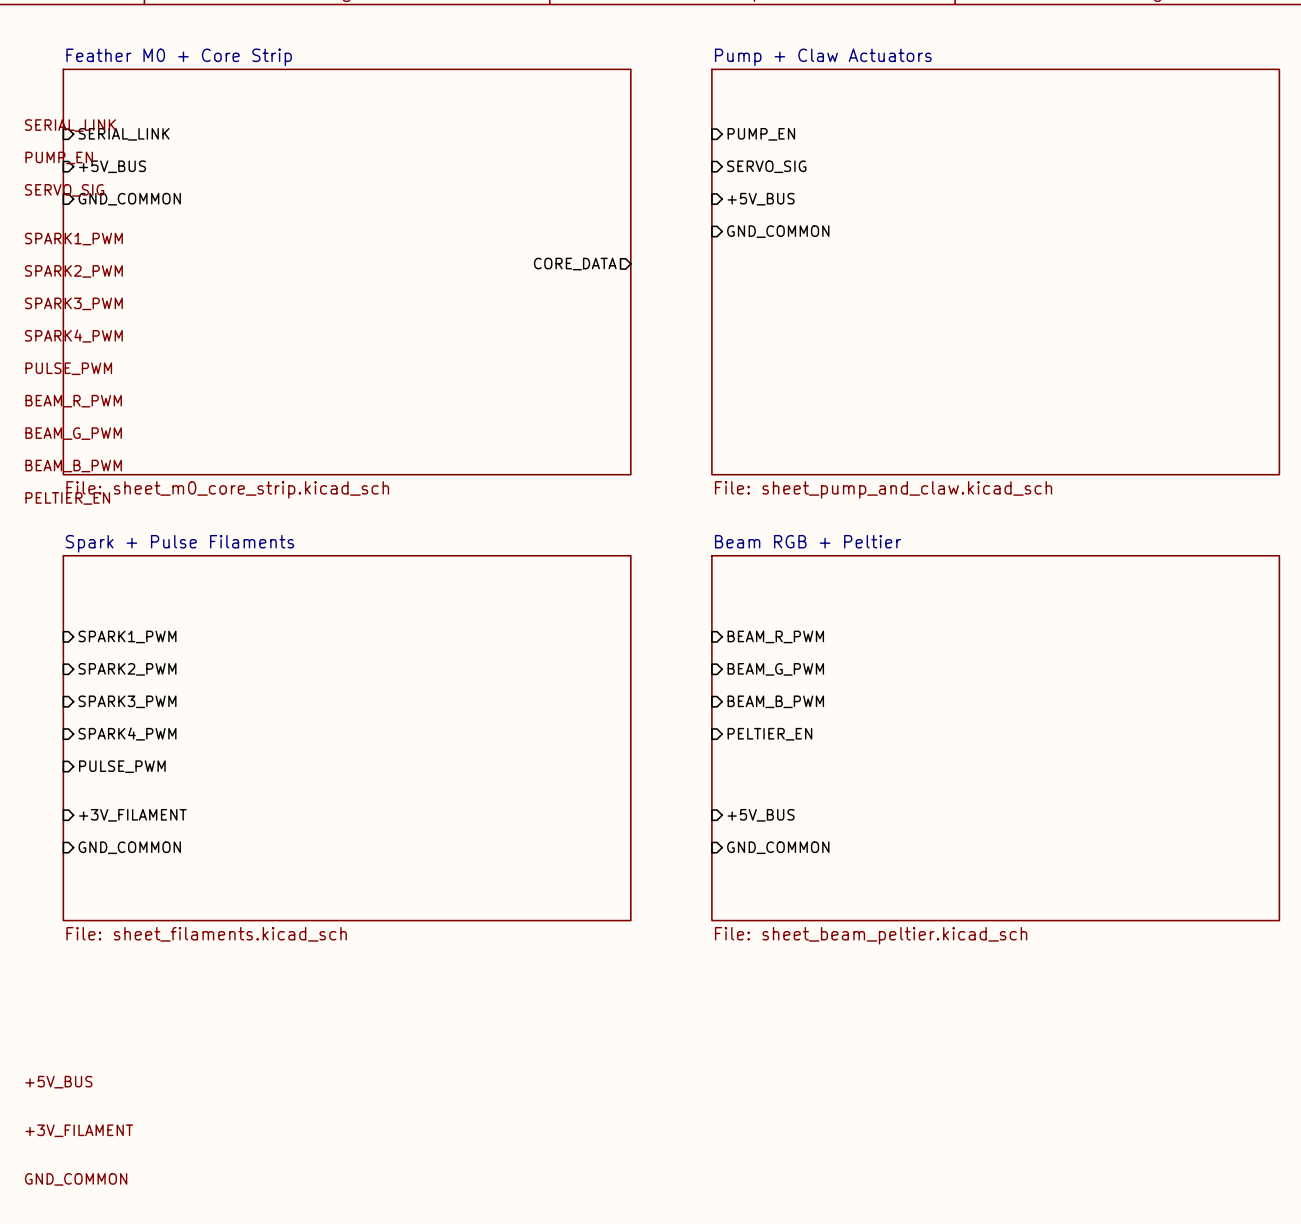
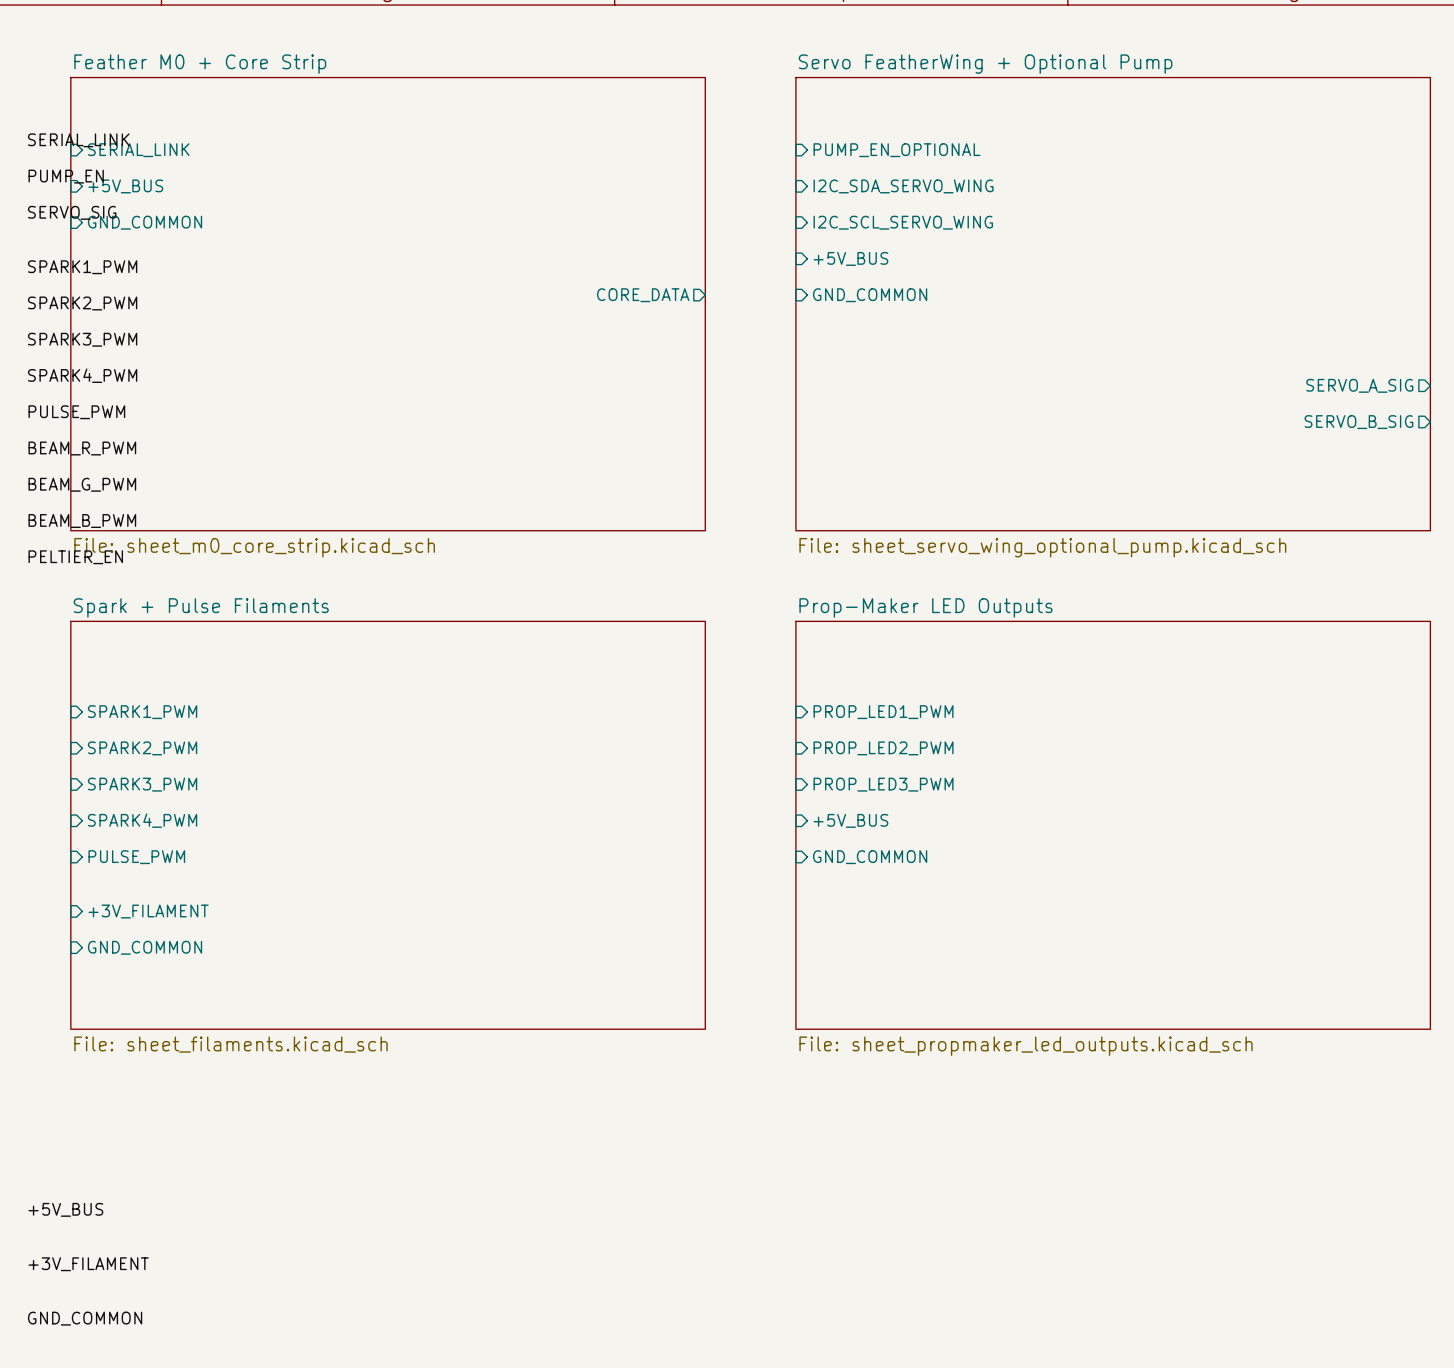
sheet Pump + Claw Actuators name: Pump + Claw Actuators (823, 57) -> Servo FeatherWing + Optional Pump (985, 64)
sheet pin: PUMP_EN (761, 134) -> PUMP_EN_OPTIONAL (896, 150)
sheet pin: SERVO_SIG (766, 166) -> I2C_SDA_SERVO_WING (903, 186)
sheet pin: +5V_BUS (761, 199) -> I2C_SCL_SERVO_WING (903, 222)
sheet pin: GND_COMMON (778, 231) -> +5V_BUS (850, 258)
sheet pin: none -> GND_COMMON (870, 295)
sheet pin: none -> SERVO_A_SIG (1359, 385)
sheet pin: none -> SERVO_B_SIG (1358, 422)
sheet Pump + Claw Actuators value: File: sheet_pump_and_claw.kicad_sch (883, 489) -> File: sheet_servo_wing_optional_pump.kicad_sch (1042, 547)
sheet Beam RGB + Peltier name: Beam RGB + Peltier (807, 541) -> Prop-Maker LED Outputs (926, 607)
sheet pin: BEAM_R_PWM (775, 636) -> PROP_LED1_PWM (883, 712)
sheet pin: BEAM_G_PWM (775, 669) -> PROP_LED2_PWM (883, 748)
sheet pin: BEAM_B_PWM (775, 701) -> PROP_LED3_PWM (883, 784)
sheet pin: PELTIER_EN (769, 734) -> +5V_BUS (850, 820)
sheet pin: +5V_BUS (761, 815) -> none
sheet pin position: GND_COMMON (778, 847) -> GND_COMMON (870, 857)
sheet Beam RGB + Peltier value: File: sheet_beam_peltier.kicad_sch (871, 935) -> File: sheet_propmaker_led_outputs.kicad_sch (1026, 1046)

